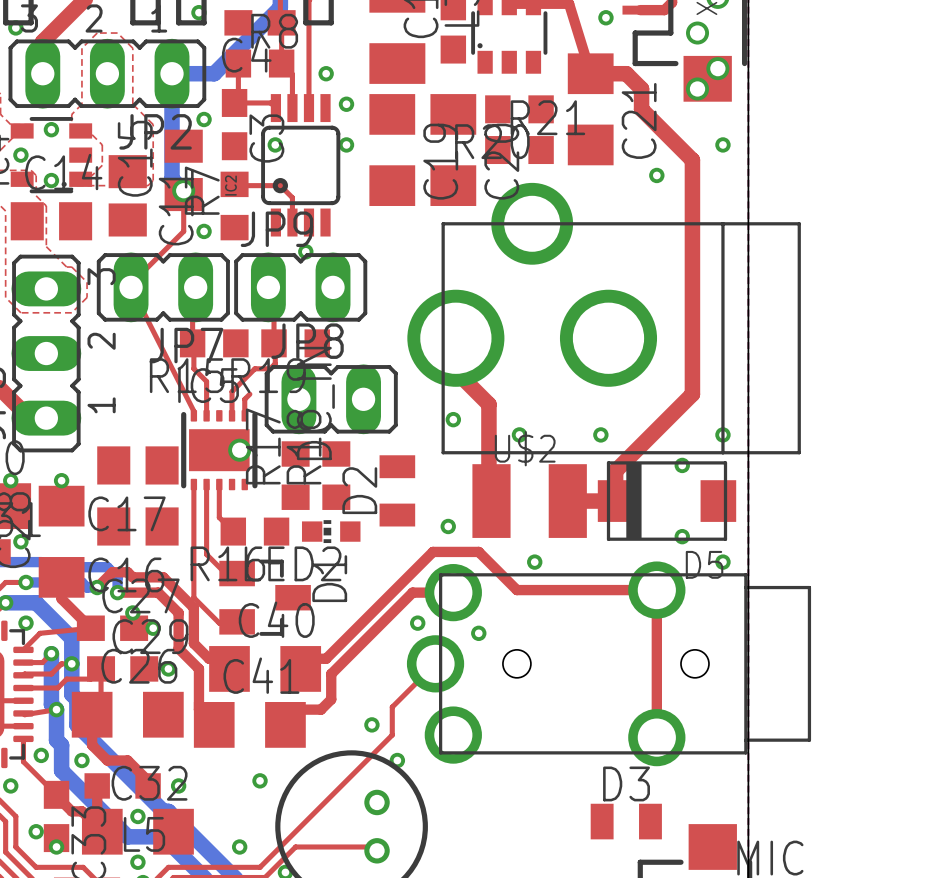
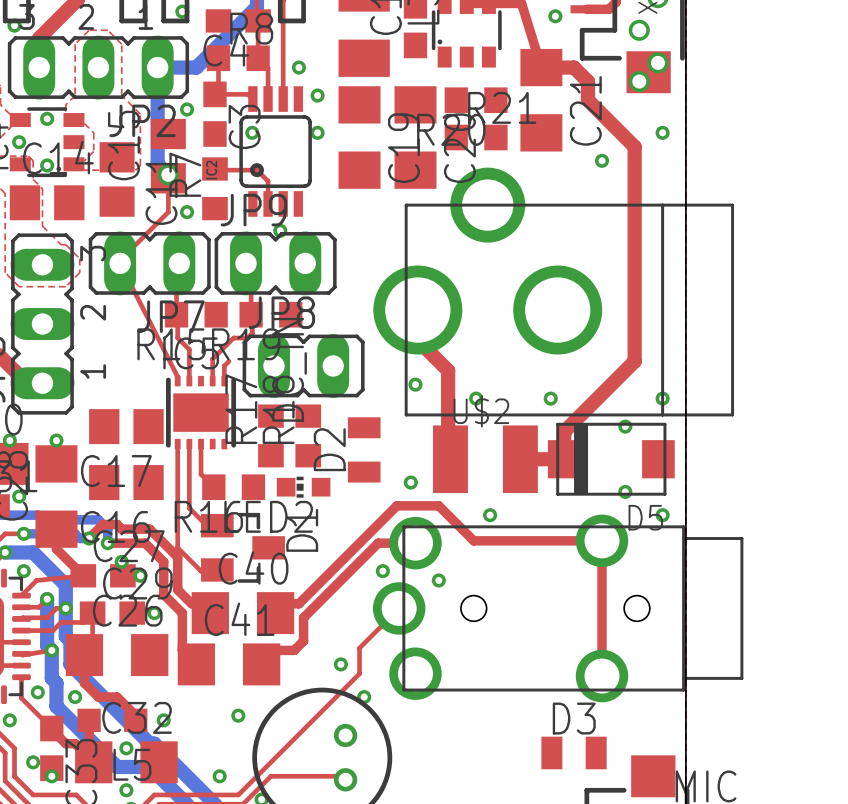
via: (239, 450) -> none

